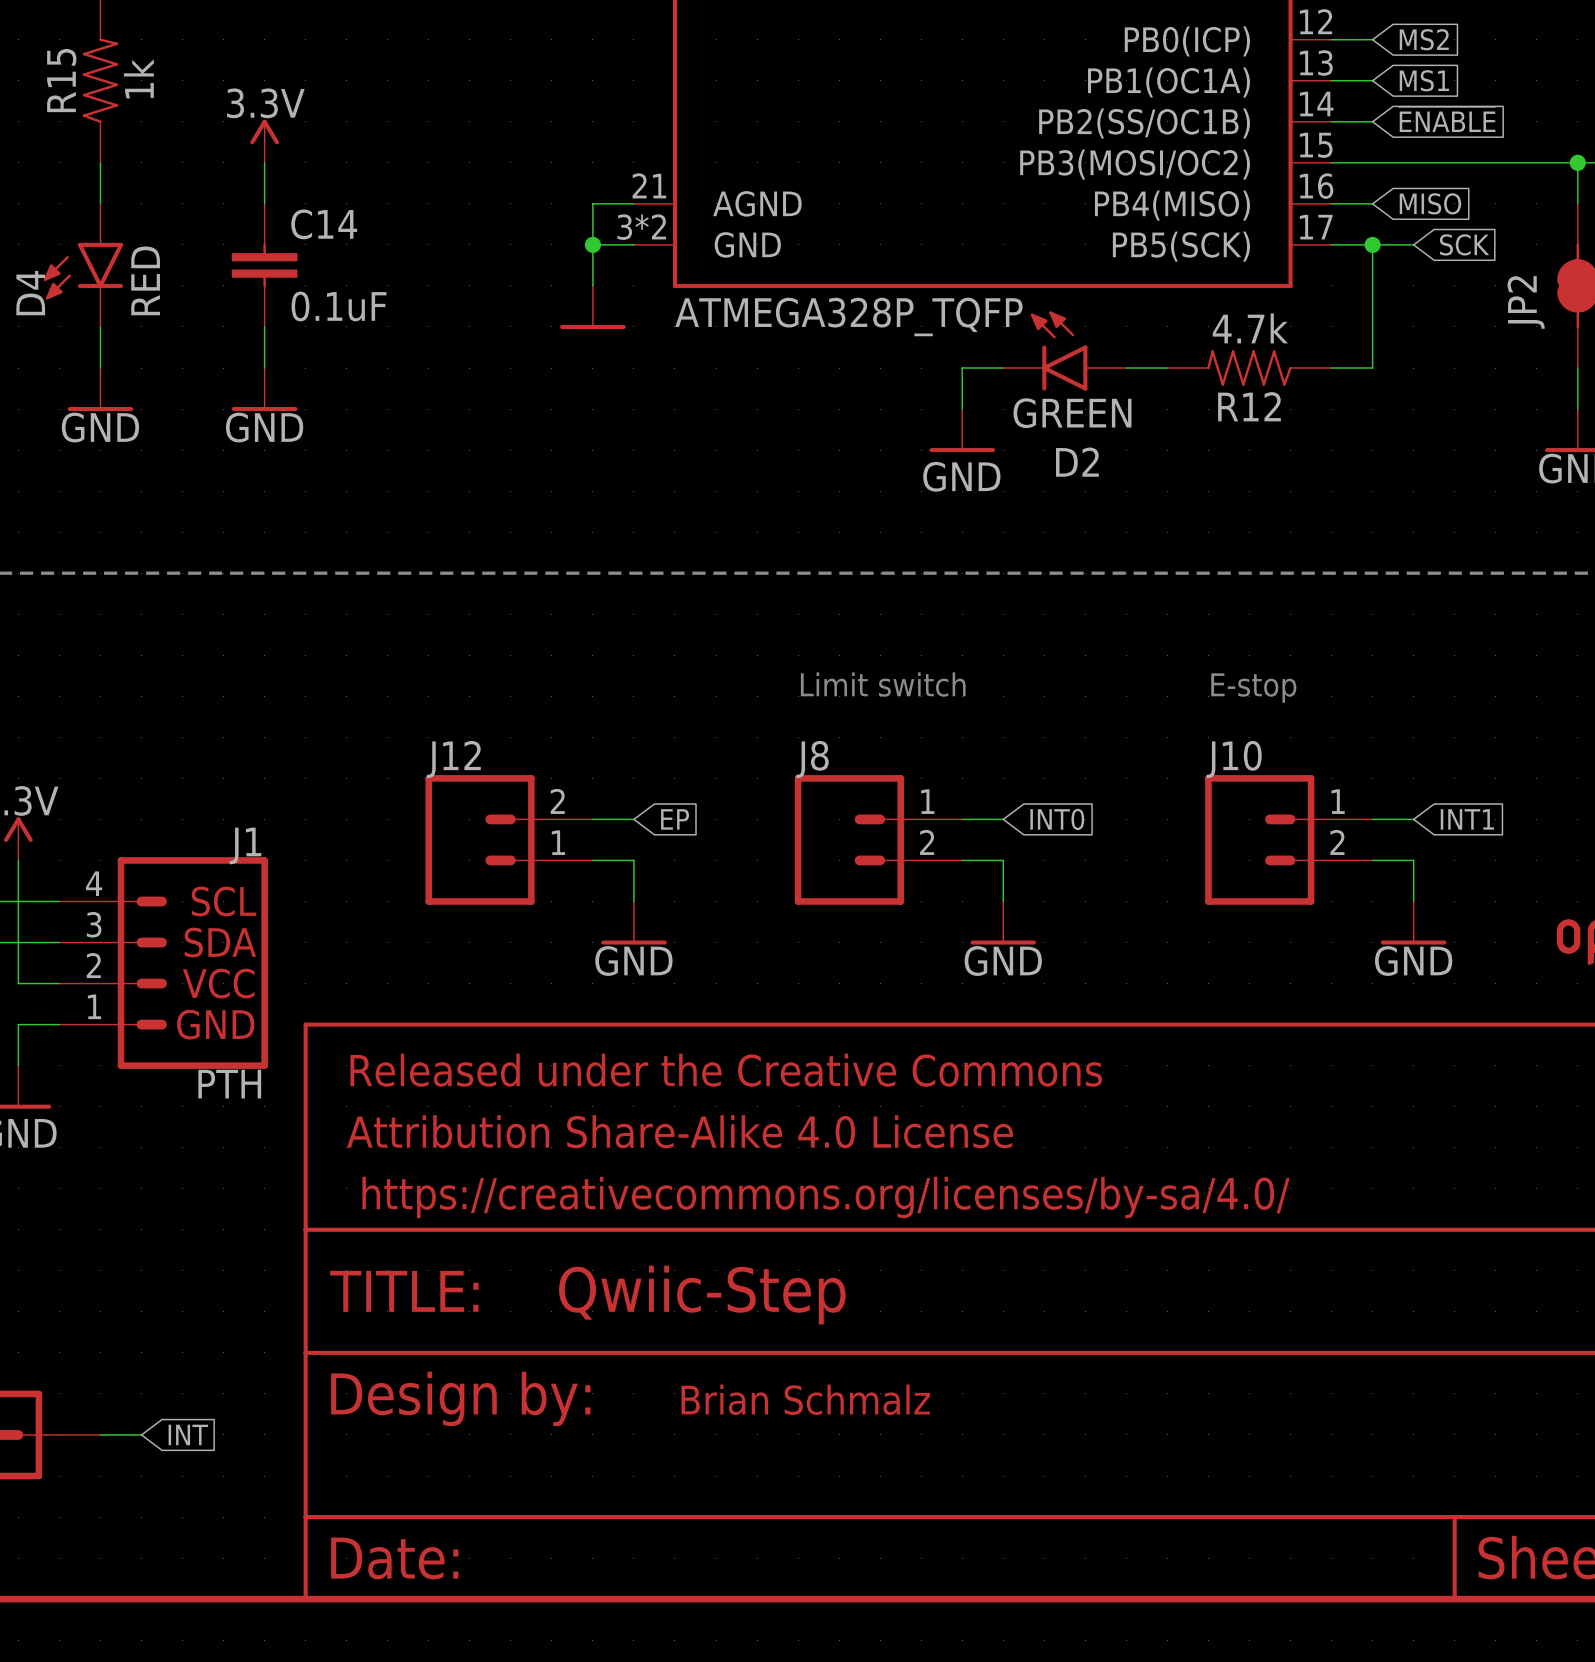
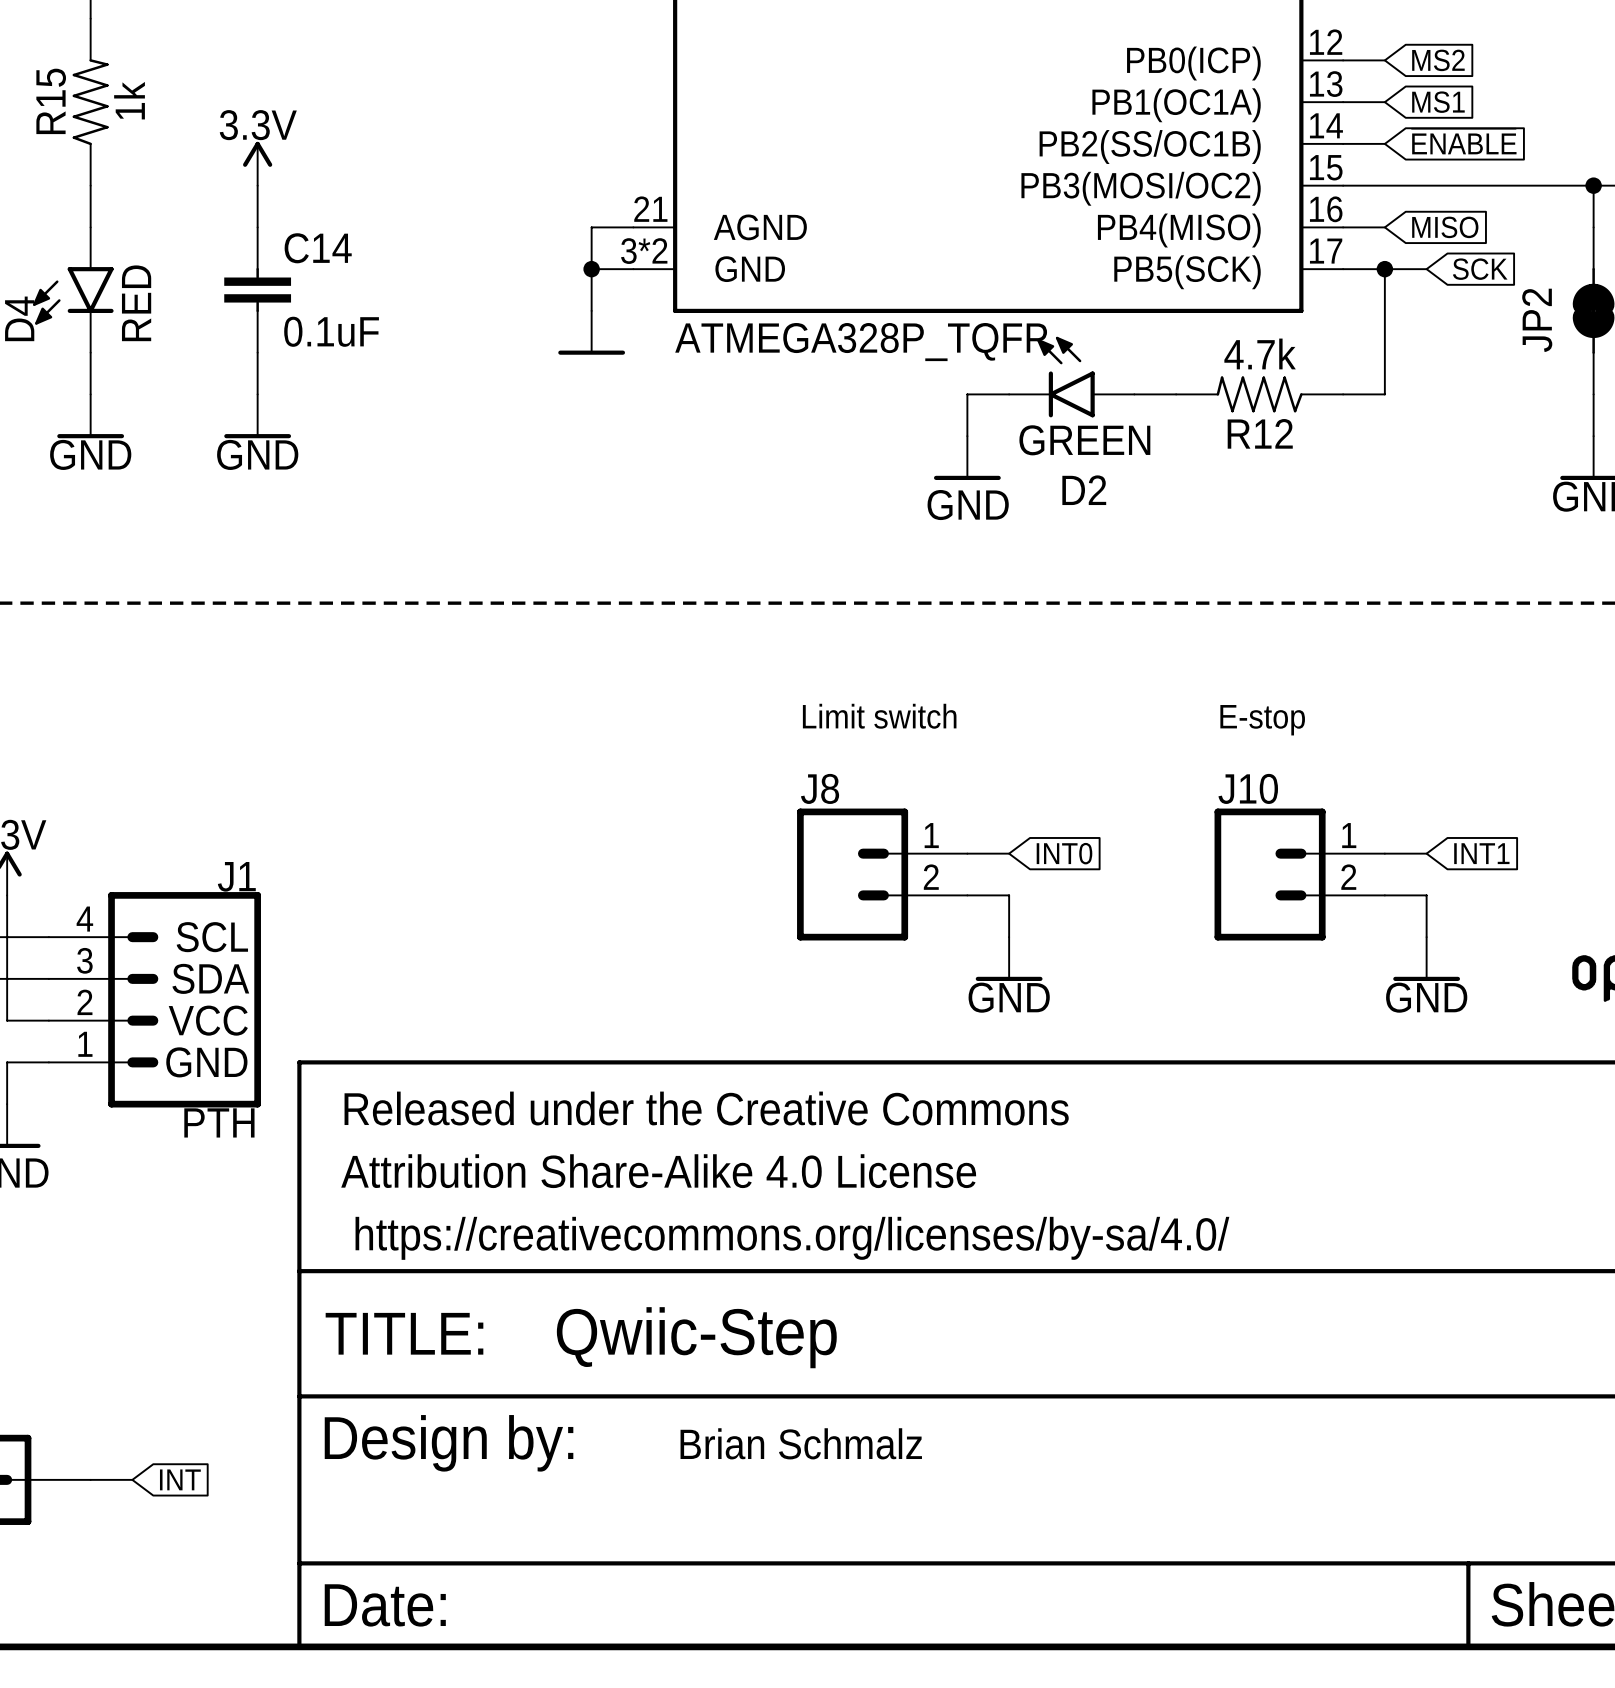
wire: (592, 819) (633, 819) -> none
global label: EP (675, 819) -> none
J12: (509, 839) -> none
wire: (592, 860) (633, 860) (633, 901) -> none
power symbol: GND (633, 923) -> none

